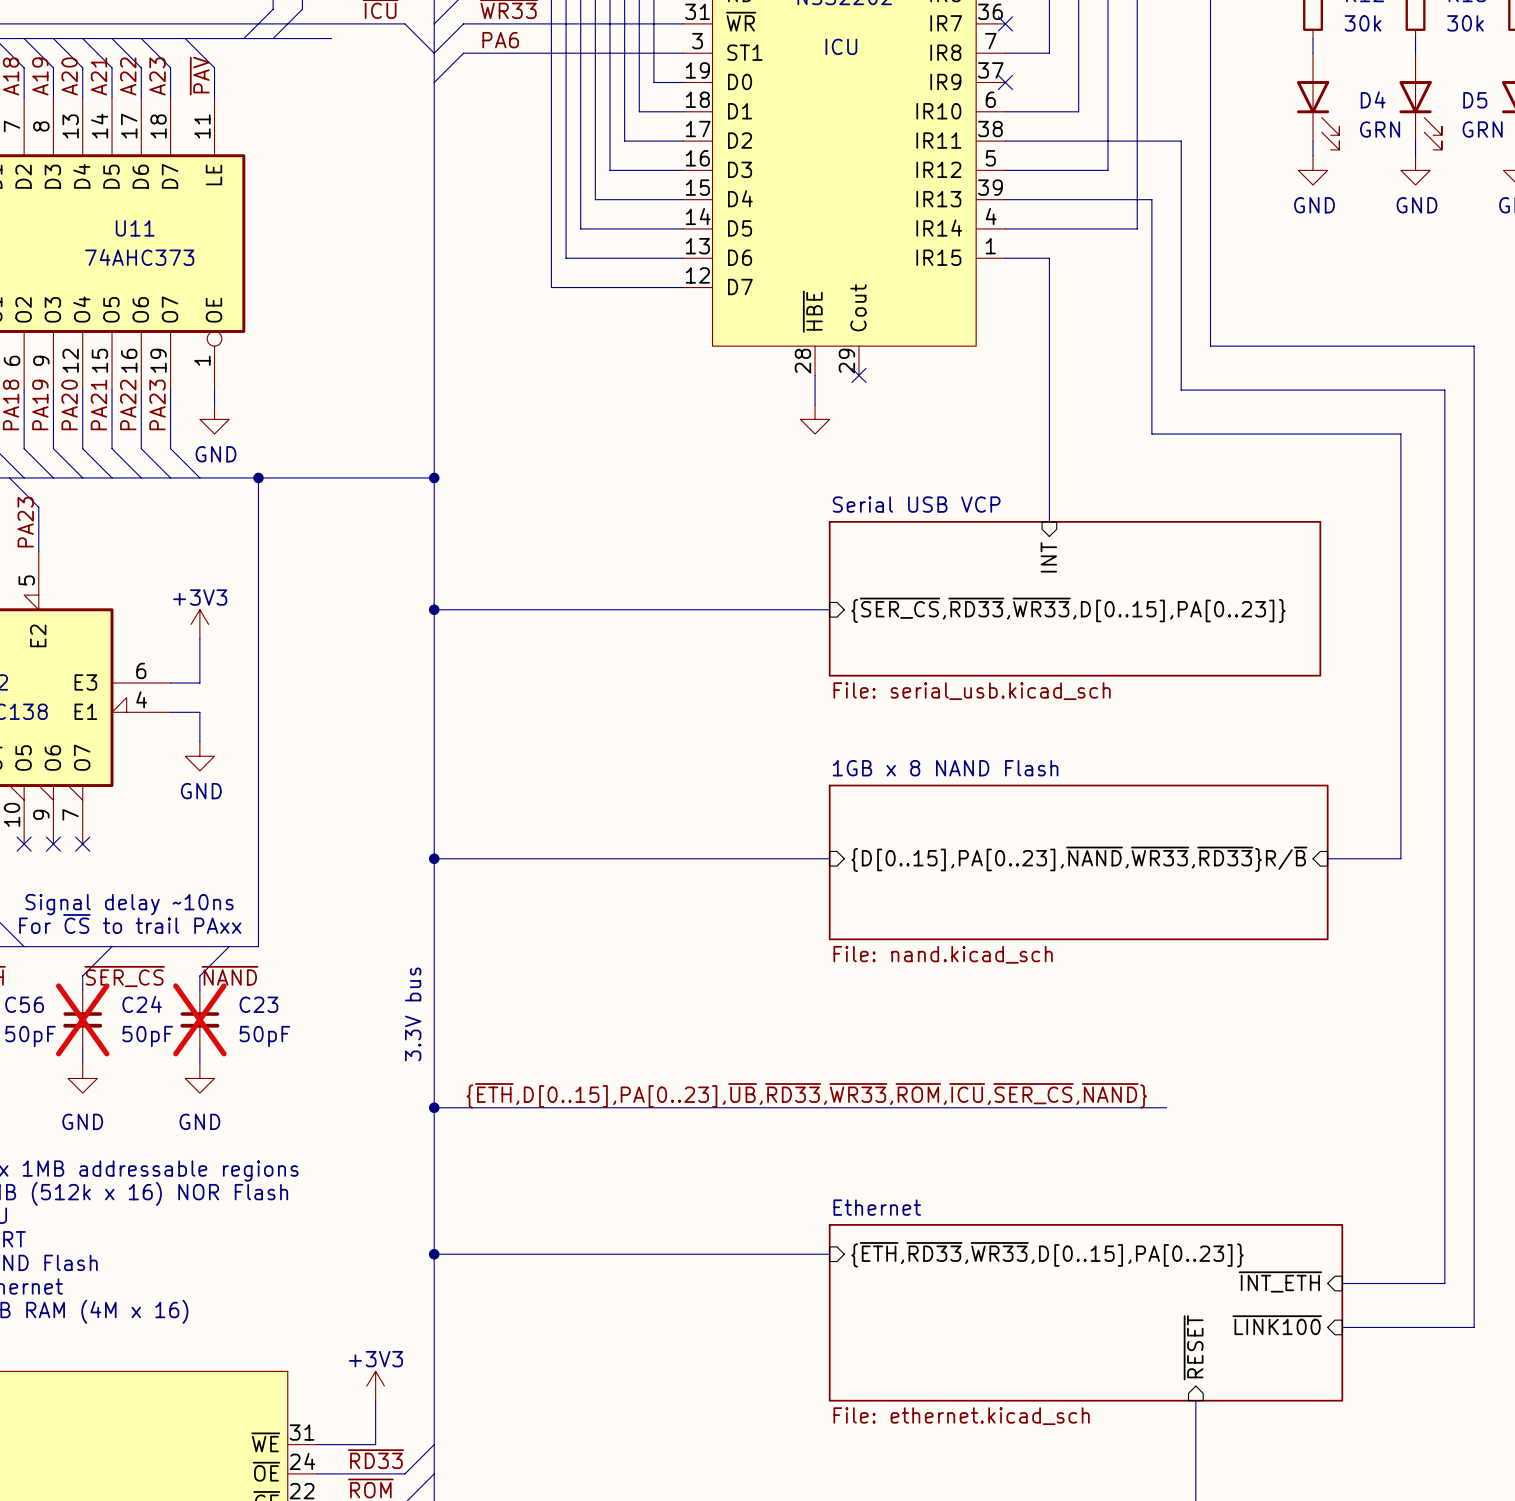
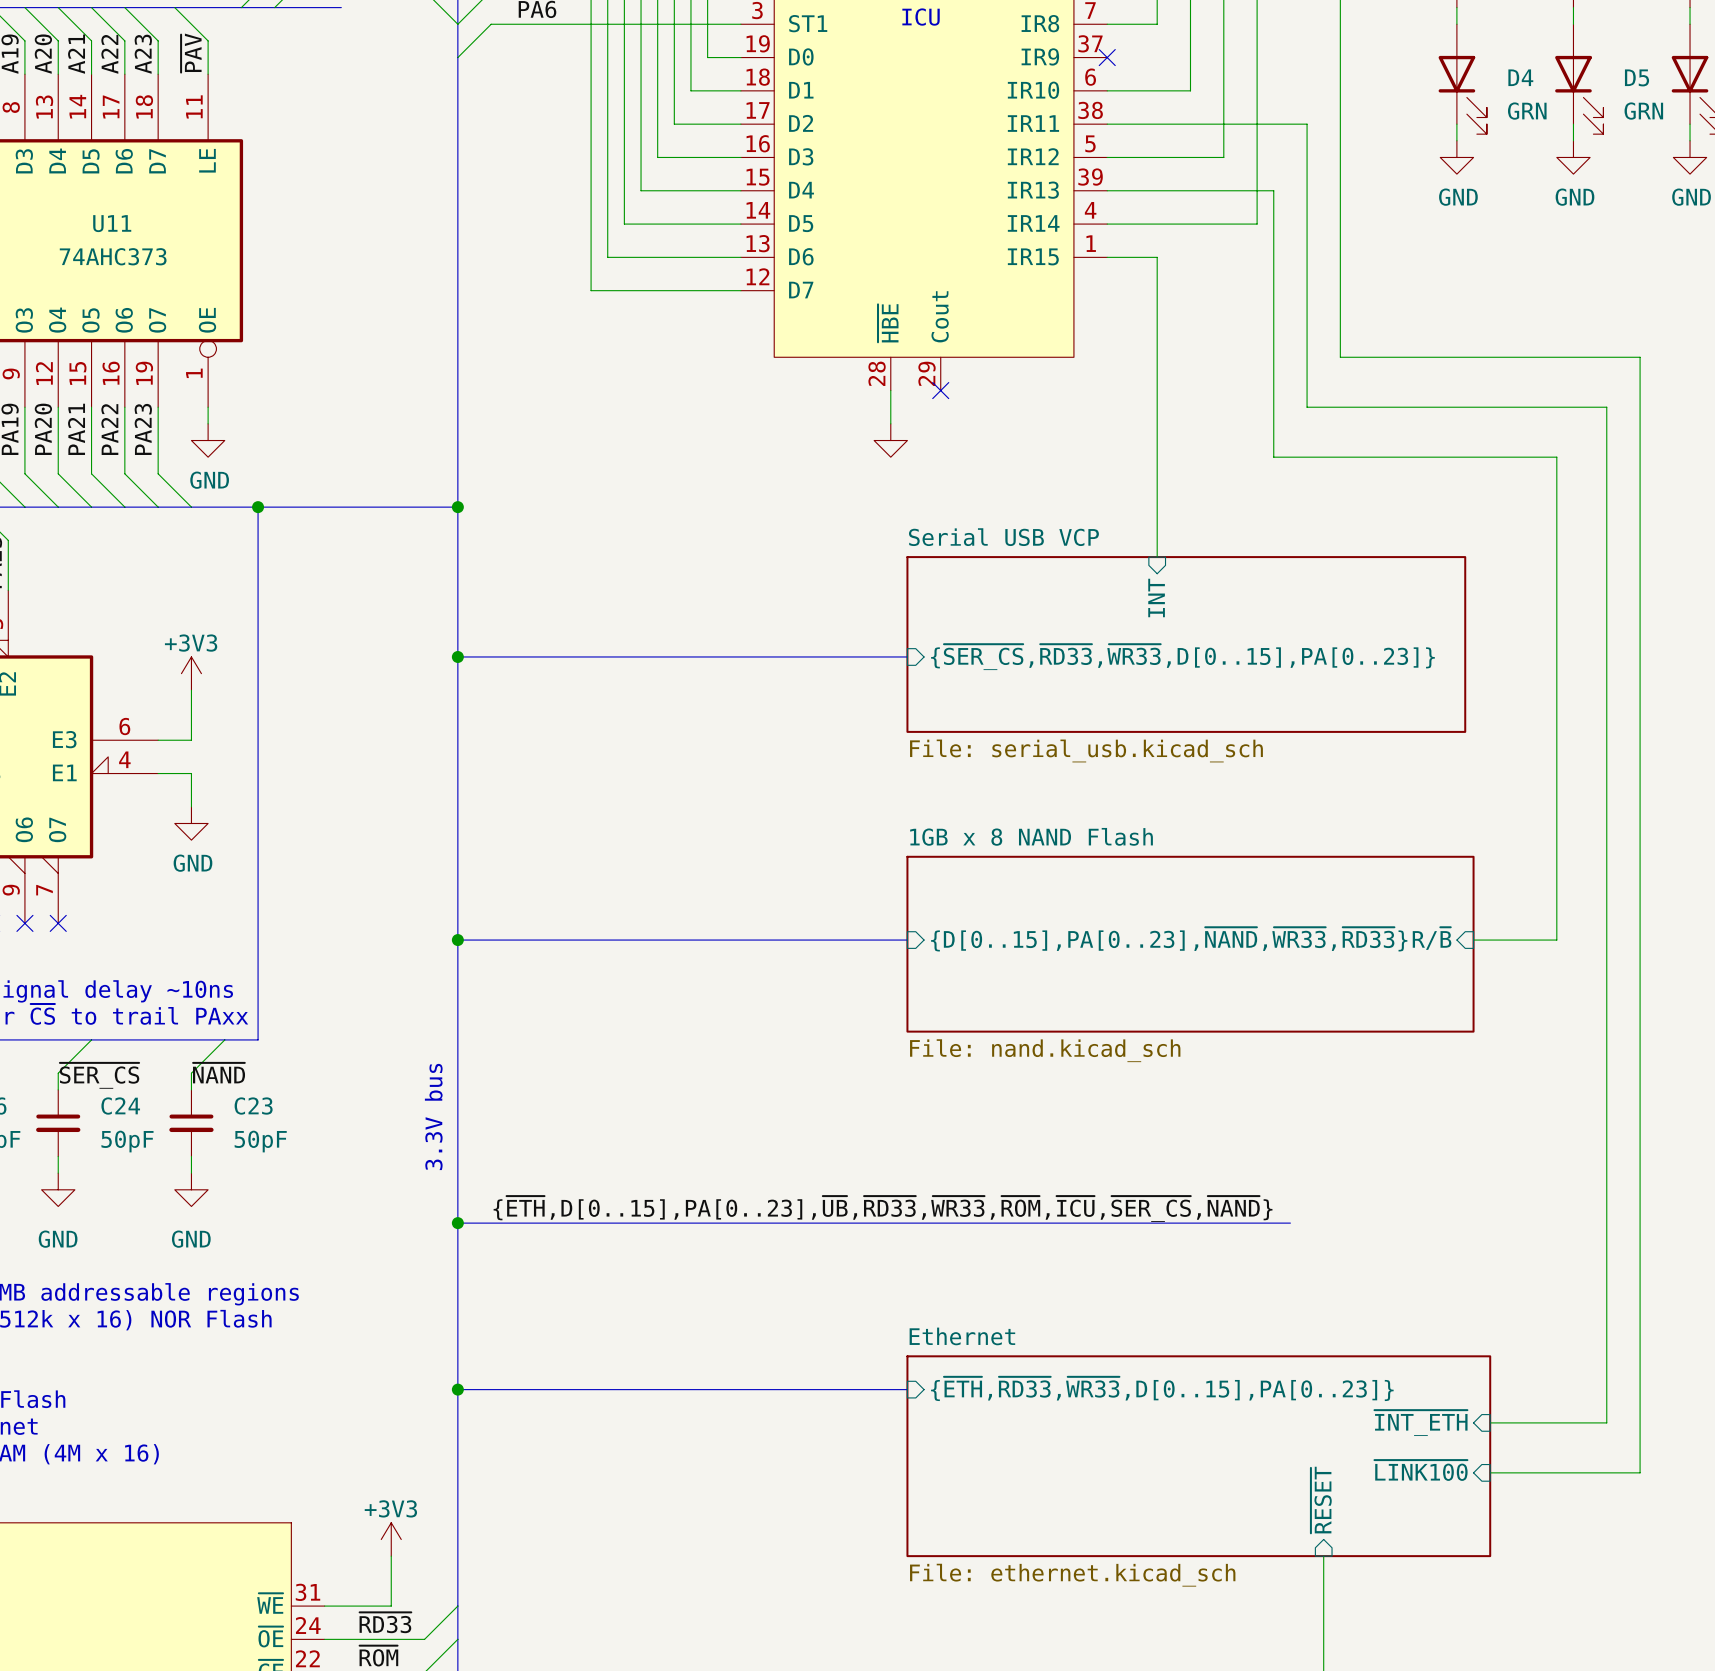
C24 do-not-place cross: (82, 1019) -> none
C23 do-not-place cross: (199, 1019) -> none

